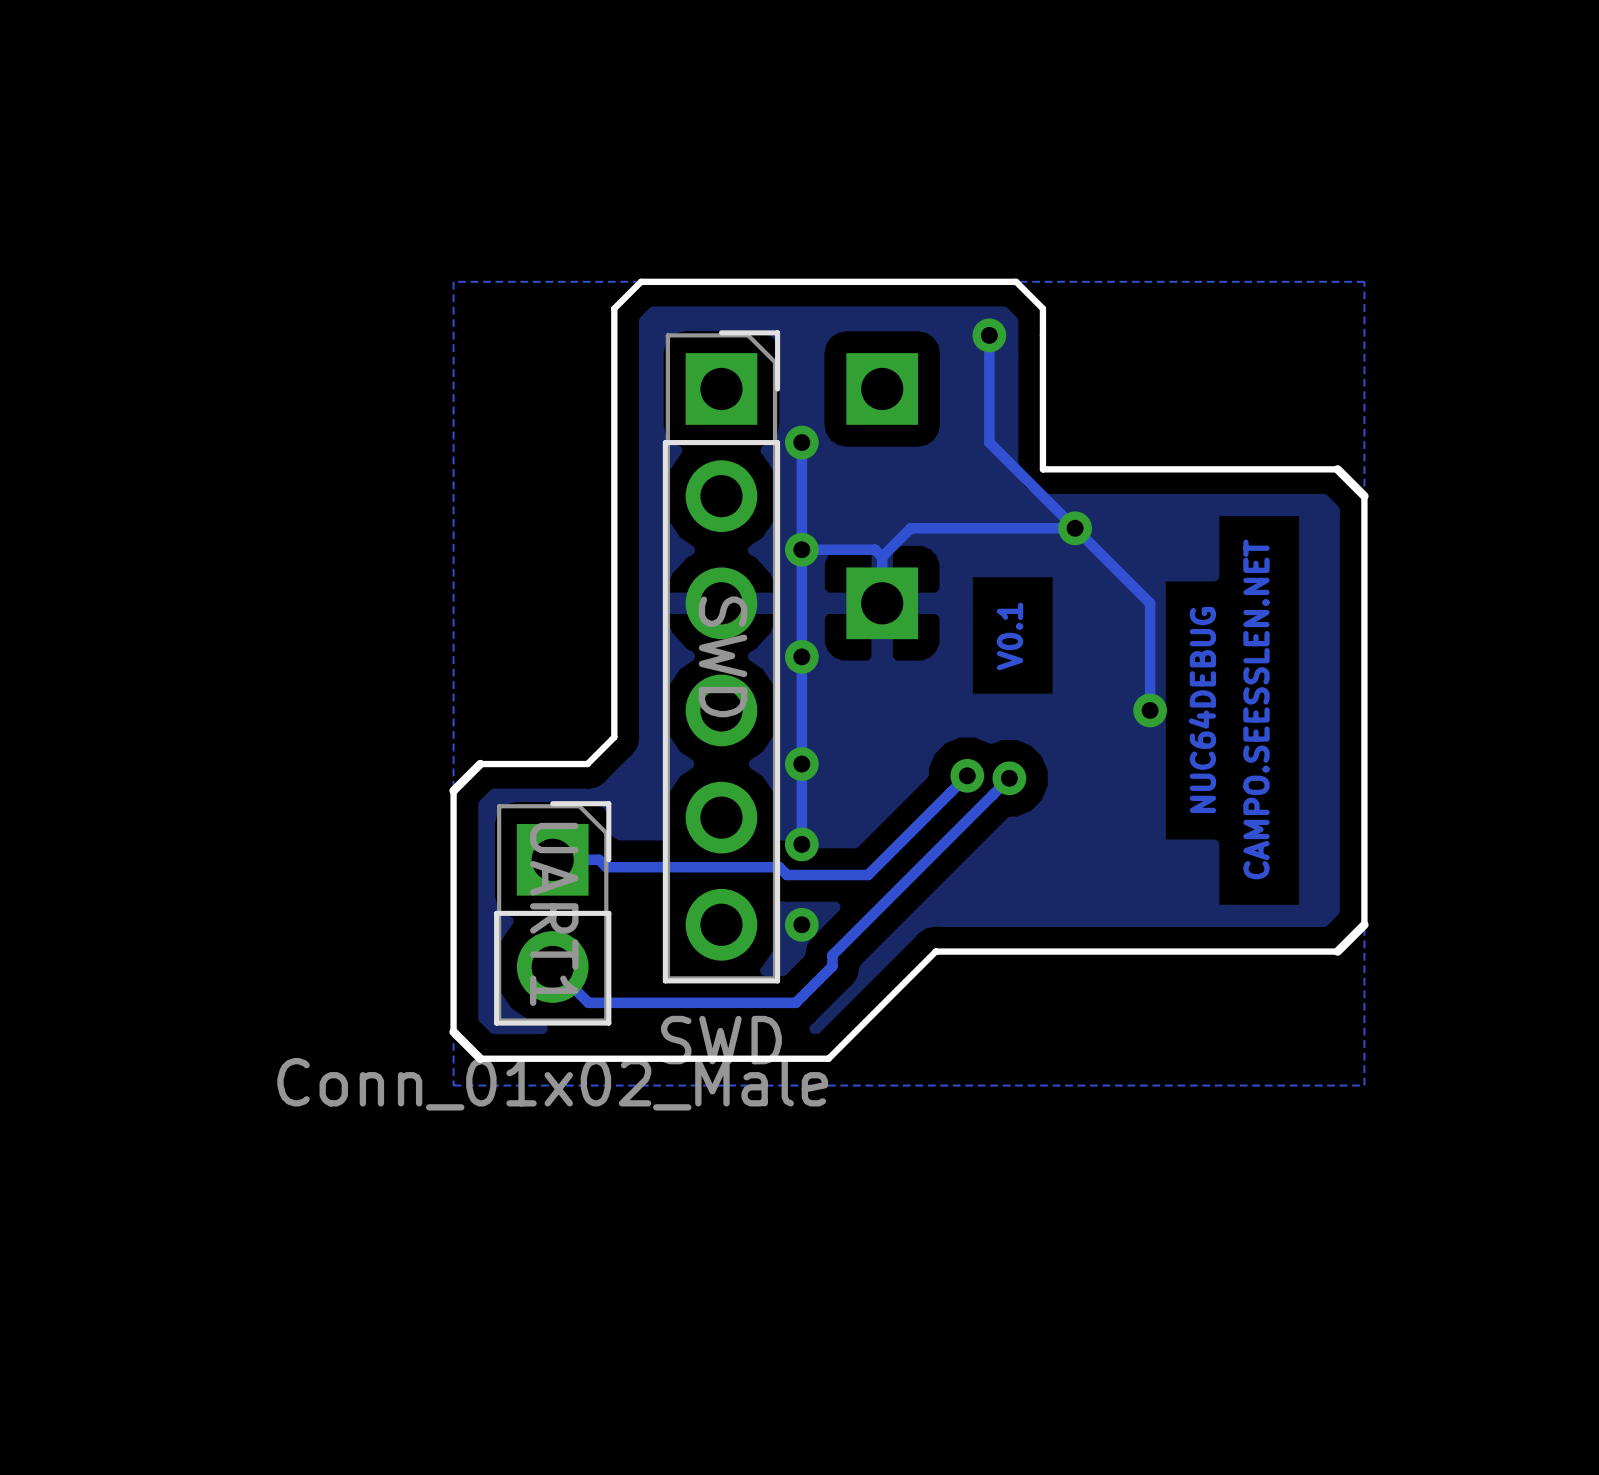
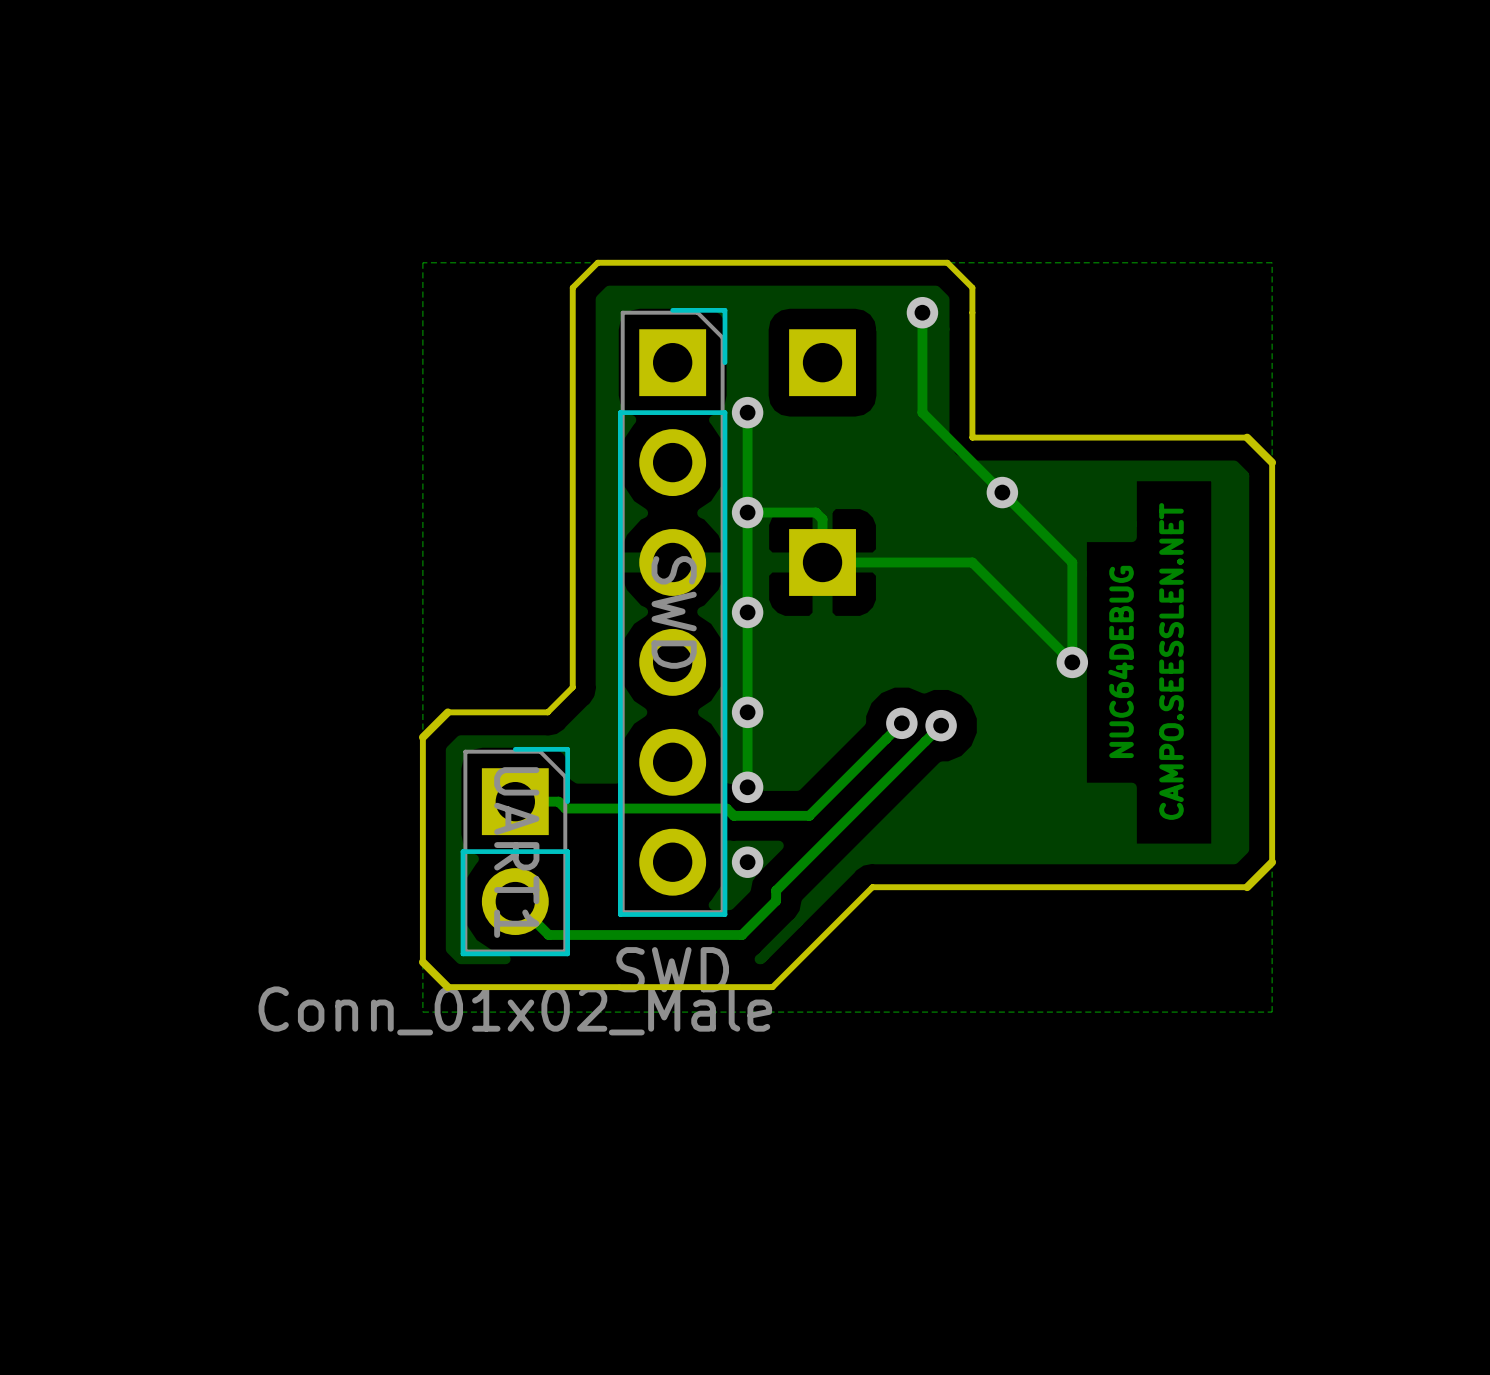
track: (1075, 528) (910, 528) (882, 556) -> none
track: none -> (822, 562) (972, 562) (1072, 662)
text: V0.1 (1010, 636) -> none

